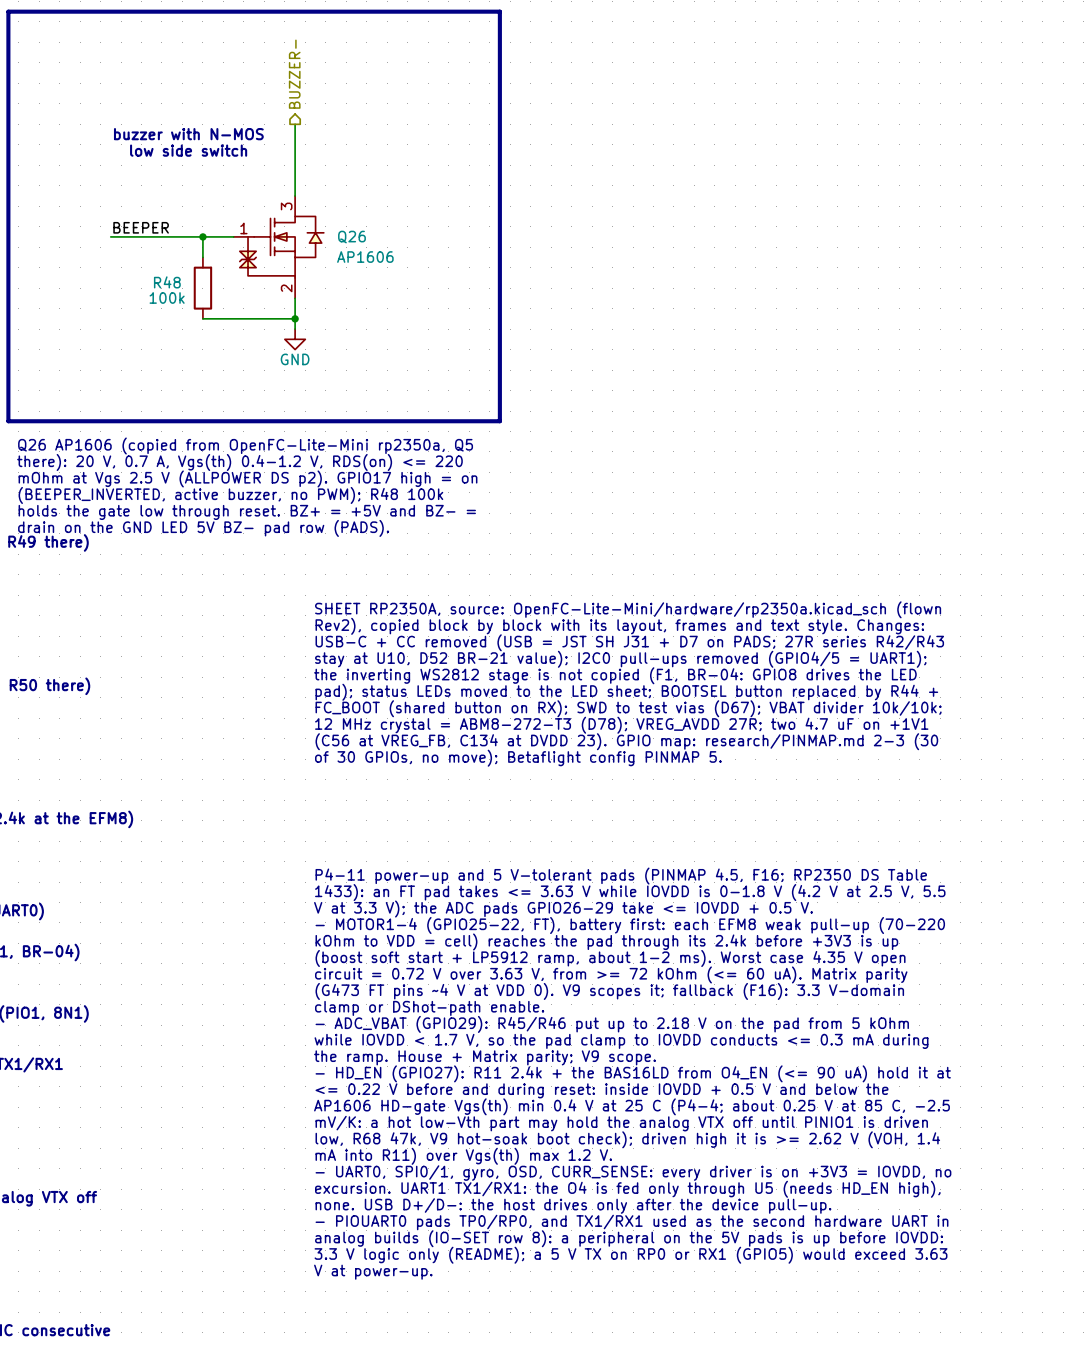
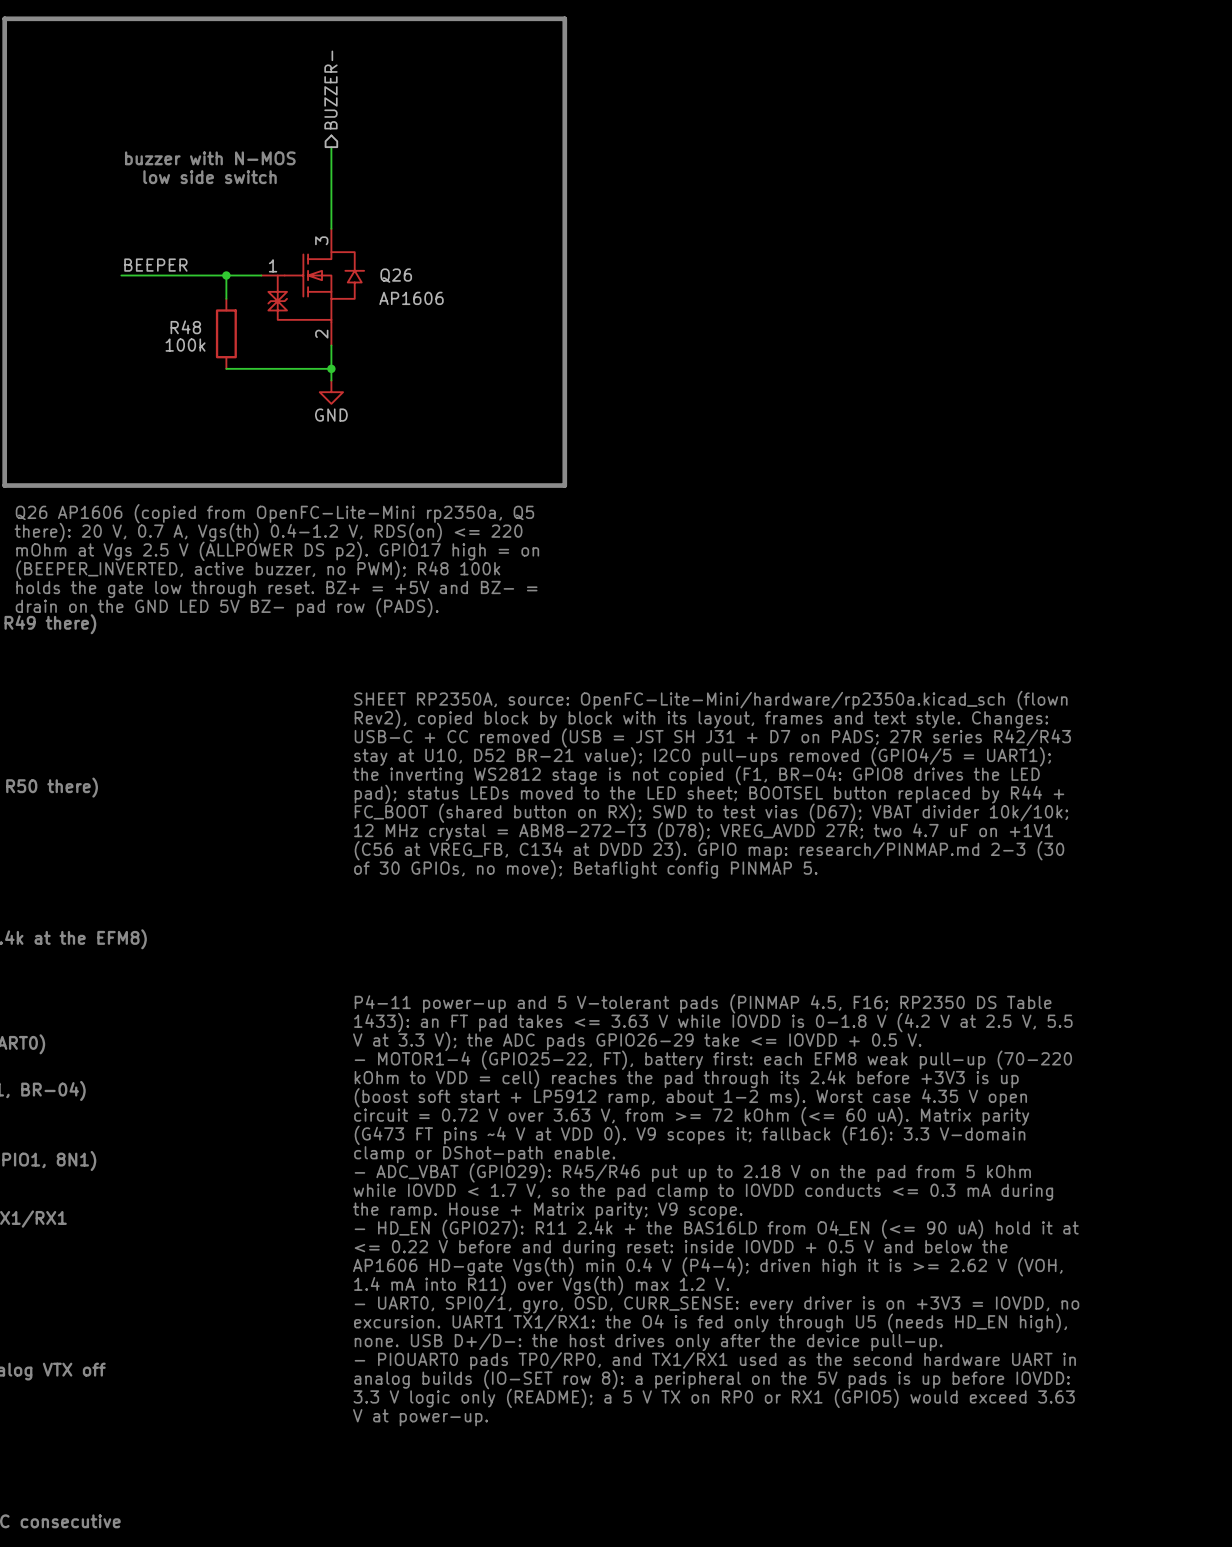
text: AP1606 HD-gate Vgs(th) min 0.4 V at 25 C (P4-4; about 0.25 V at 85 C, -2.5 (631, 1106) -> AP1606 HD-gate Vgs(th) min 0.4 V (P4-4); driven high it is >= 2.62 V (VOH, (707, 1266)
text: mV/K: a hot low-Vth part may hold the analog VTX off until PINIO1 is driven (621, 1123) -> 1.4 mA into R11) over Vgs(th) max 1.2 V. (541, 1285)
text: low, R68 47k, V9 hot-soak boot check); driven high it is >= 2.62 V (VOH, 1.4 (627, 1139) -> - UART0, SPI0/1, gyro, OSD, CURR_SENSE: every driver is on +3V3 = IOVDD, no (716, 1304)
text: mA into R11) over Vgs(th) max 1.2 V. (463, 1156) -> excursion. UART1 TX1/RX1: the O4 is fed only through U5 (needs HD_EN high), (710, 1323)
text: - UART0, SPI0/1, gyro, OSD, CURR_SENSE: every driver is on +3V3 = IOVDD, no (633, 1173) -> none. USB D+/D-: the host drives only after the device pull-up. (648, 1342)
text: excursion. UART1 TX1/RX1: the O4 is fed only through U5 (needs HD_EN high), (627, 1189) -> - PIOUART0 pads TP0/RP0, and TX1/RX1 used as the second hardware UART in (715, 1361)
text: none. USB D+/D-: the host drives only after the device pull-up. (573, 1206) -> analog builds (IO-SET row 8): a peripheral on the 5V pads is up before IOVDD: (711, 1379)
text: - PIOUART0 pads TP0/RP0, and TX1/RX1 used as the second hardware UART in (631, 1222) -> 3.3 V logic only (README); a 5 V TX on RP0 or RX1 (GPIO5) would exceed 3.63 (714, 1398)
text: analog builds (IO-SET row 8): a peripheral on the 5V pads is up before IOVDD: (629, 1238) -> V at power-up. (420, 1417)
text: 3.3 V logic only (README); a 5 V TX on RP0 or RX1 (GPIO5) would exceed 3.63 (631, 1255) -> none
text: V at power-up. (373, 1272) -> none

